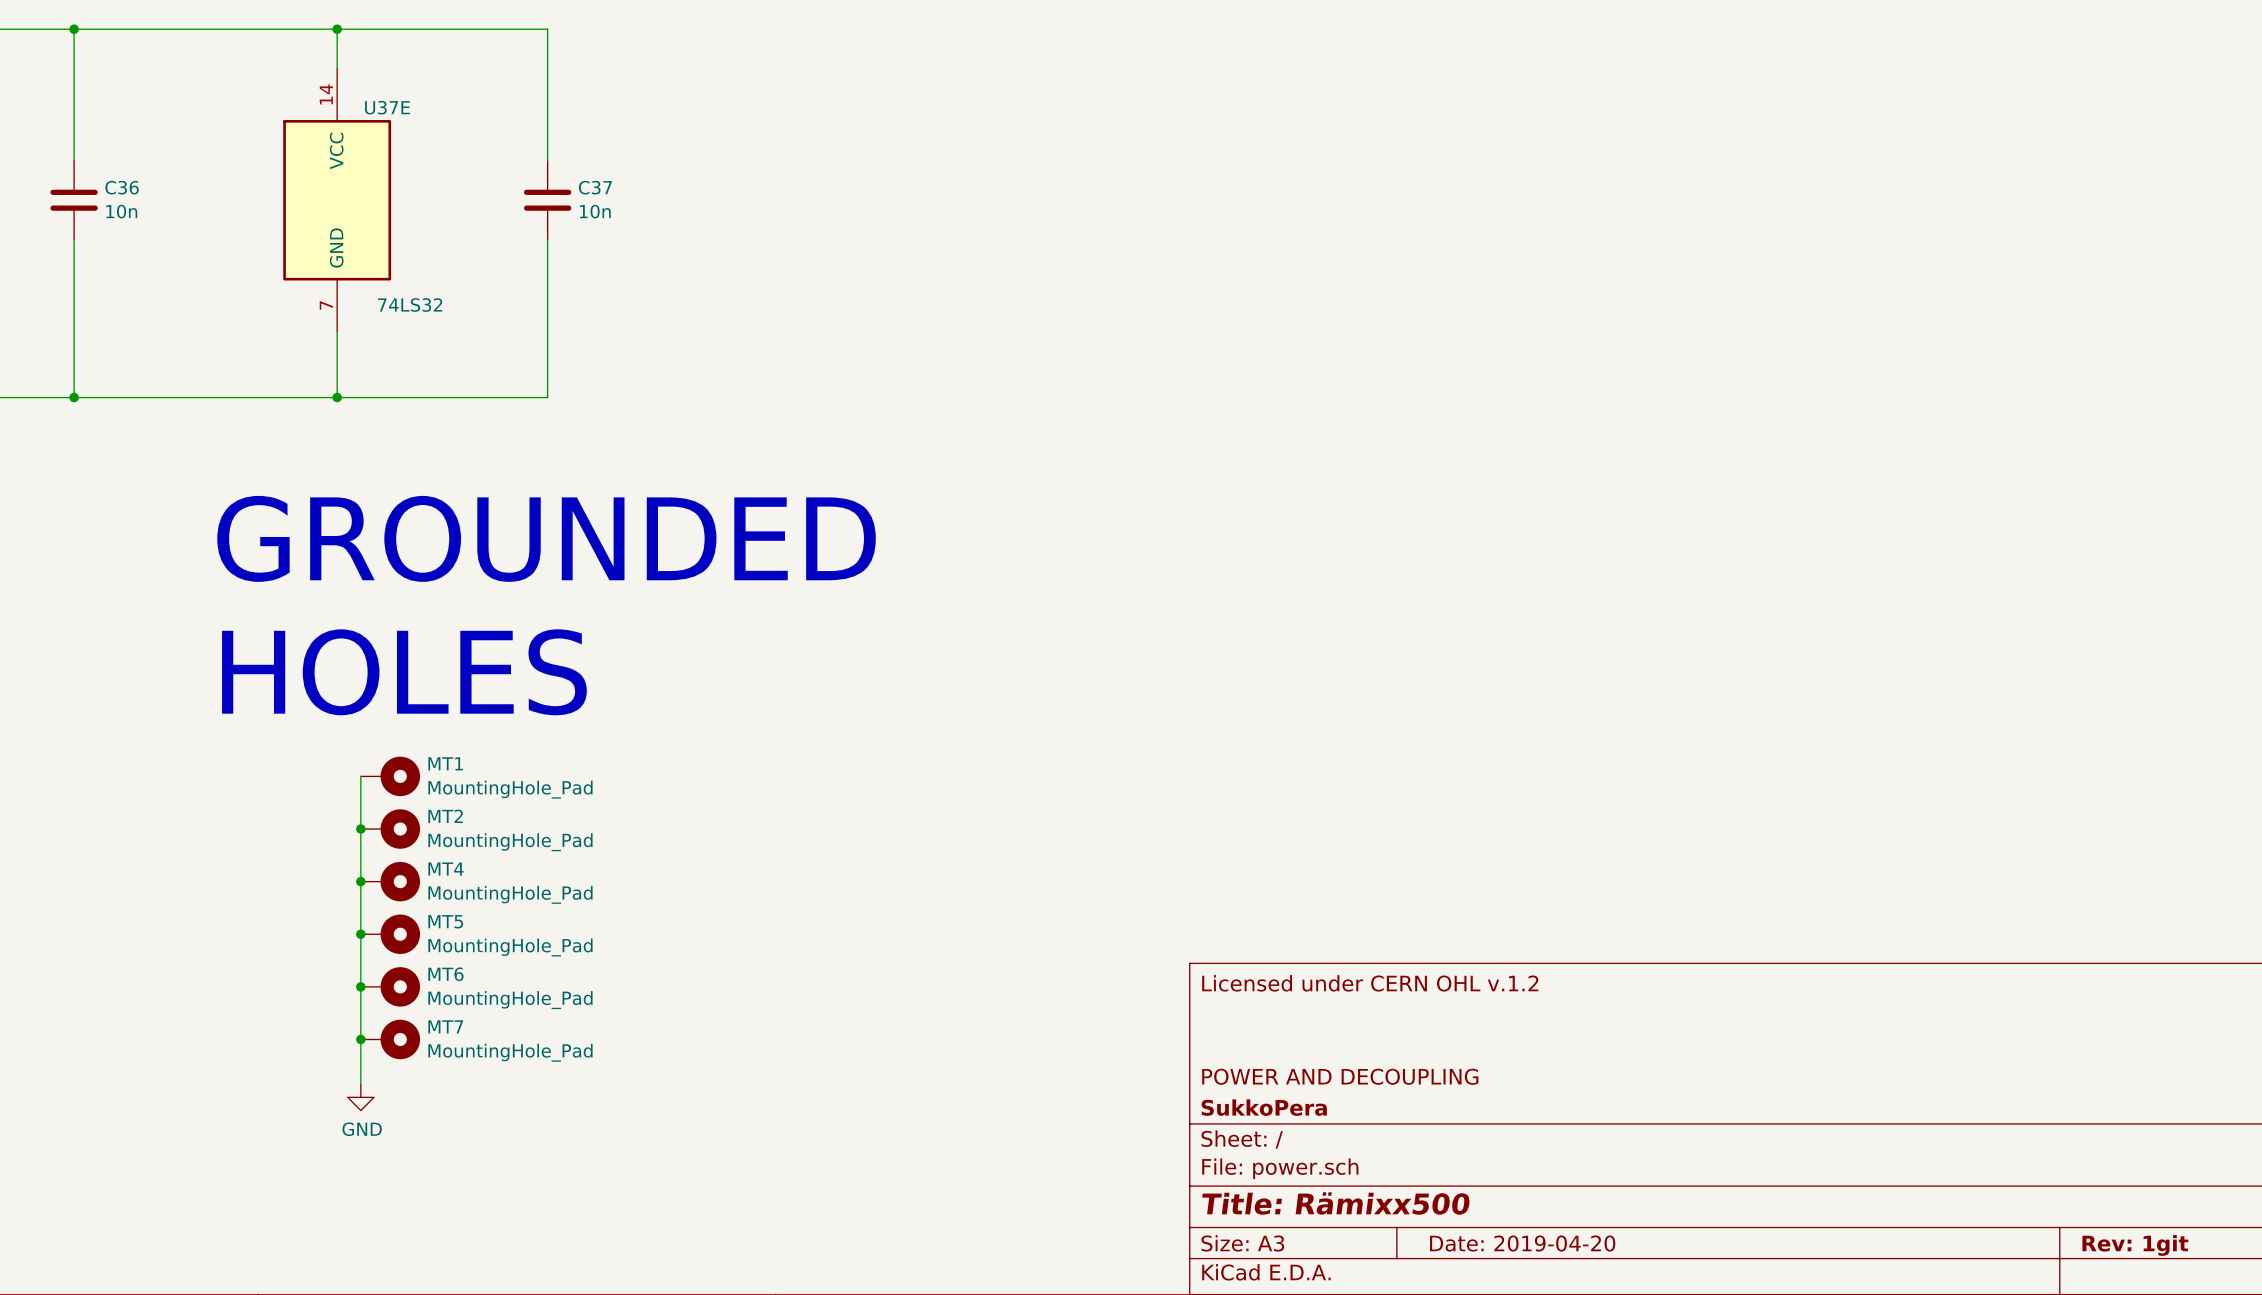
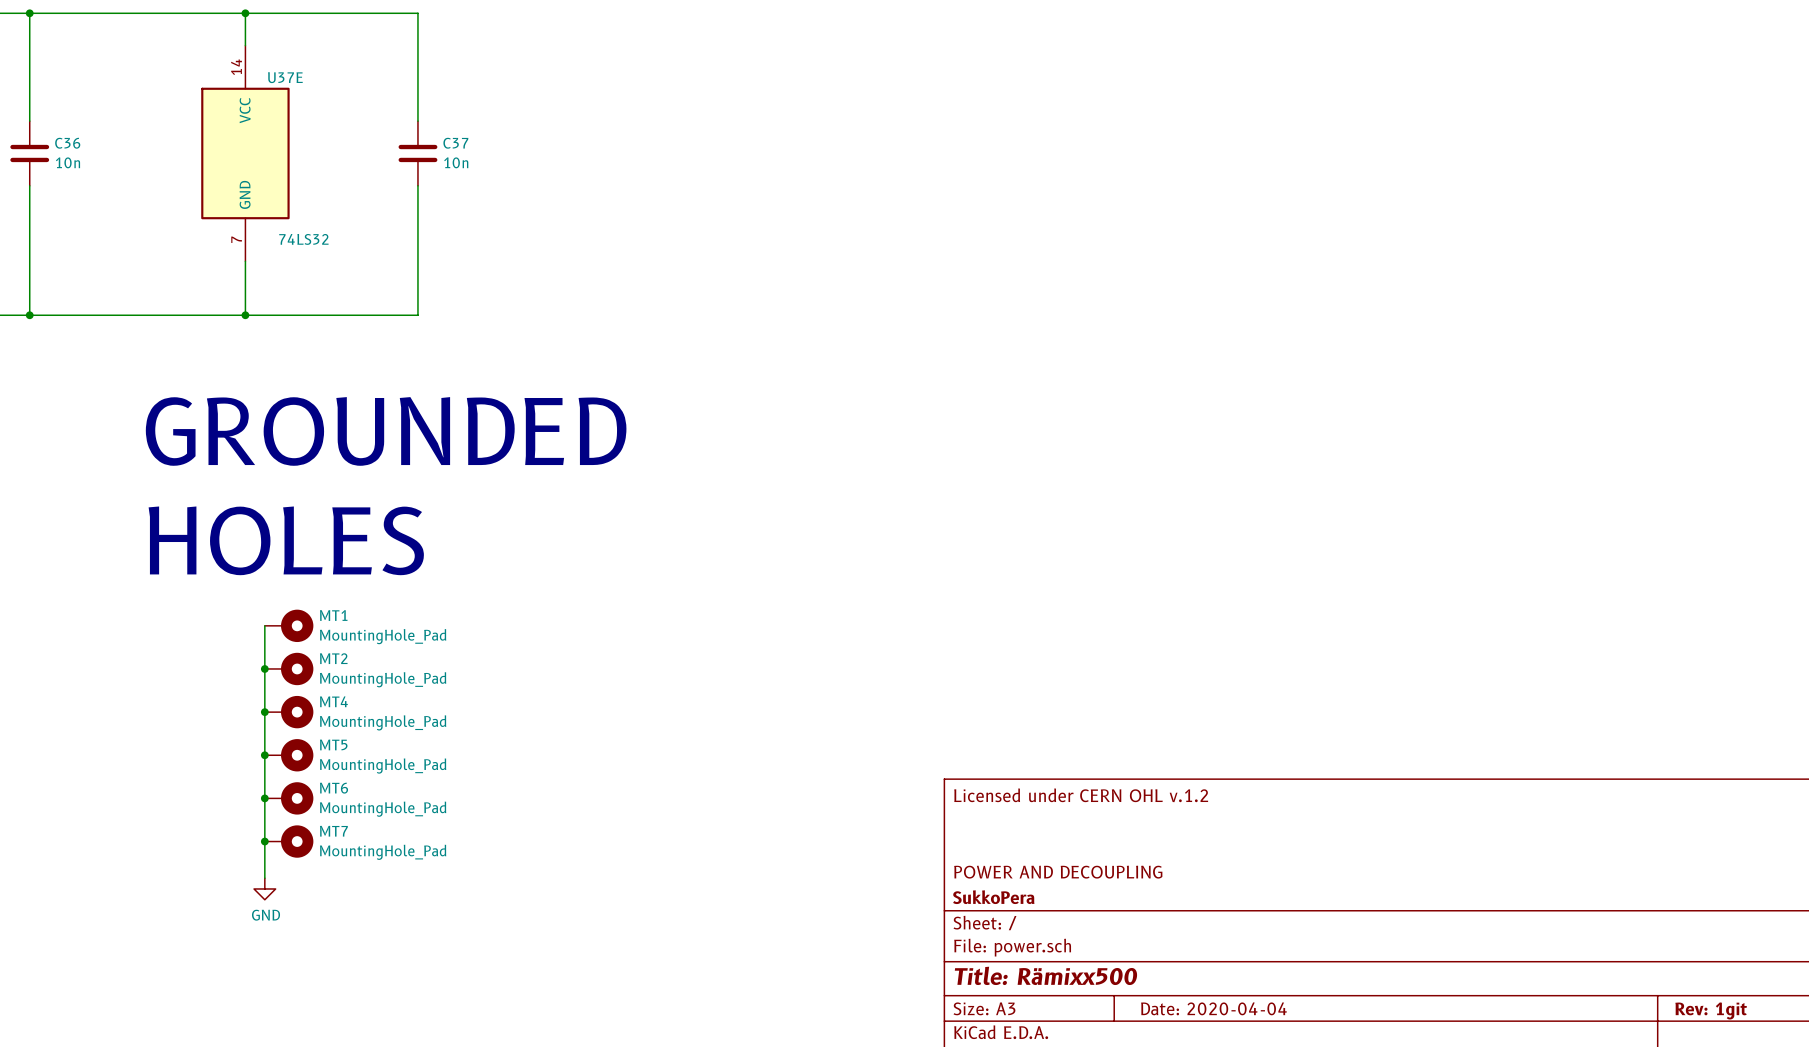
title block: Date: 2019-04-20 (1522, 1243) -> Date: 2020-04-04 (1213, 1008)

